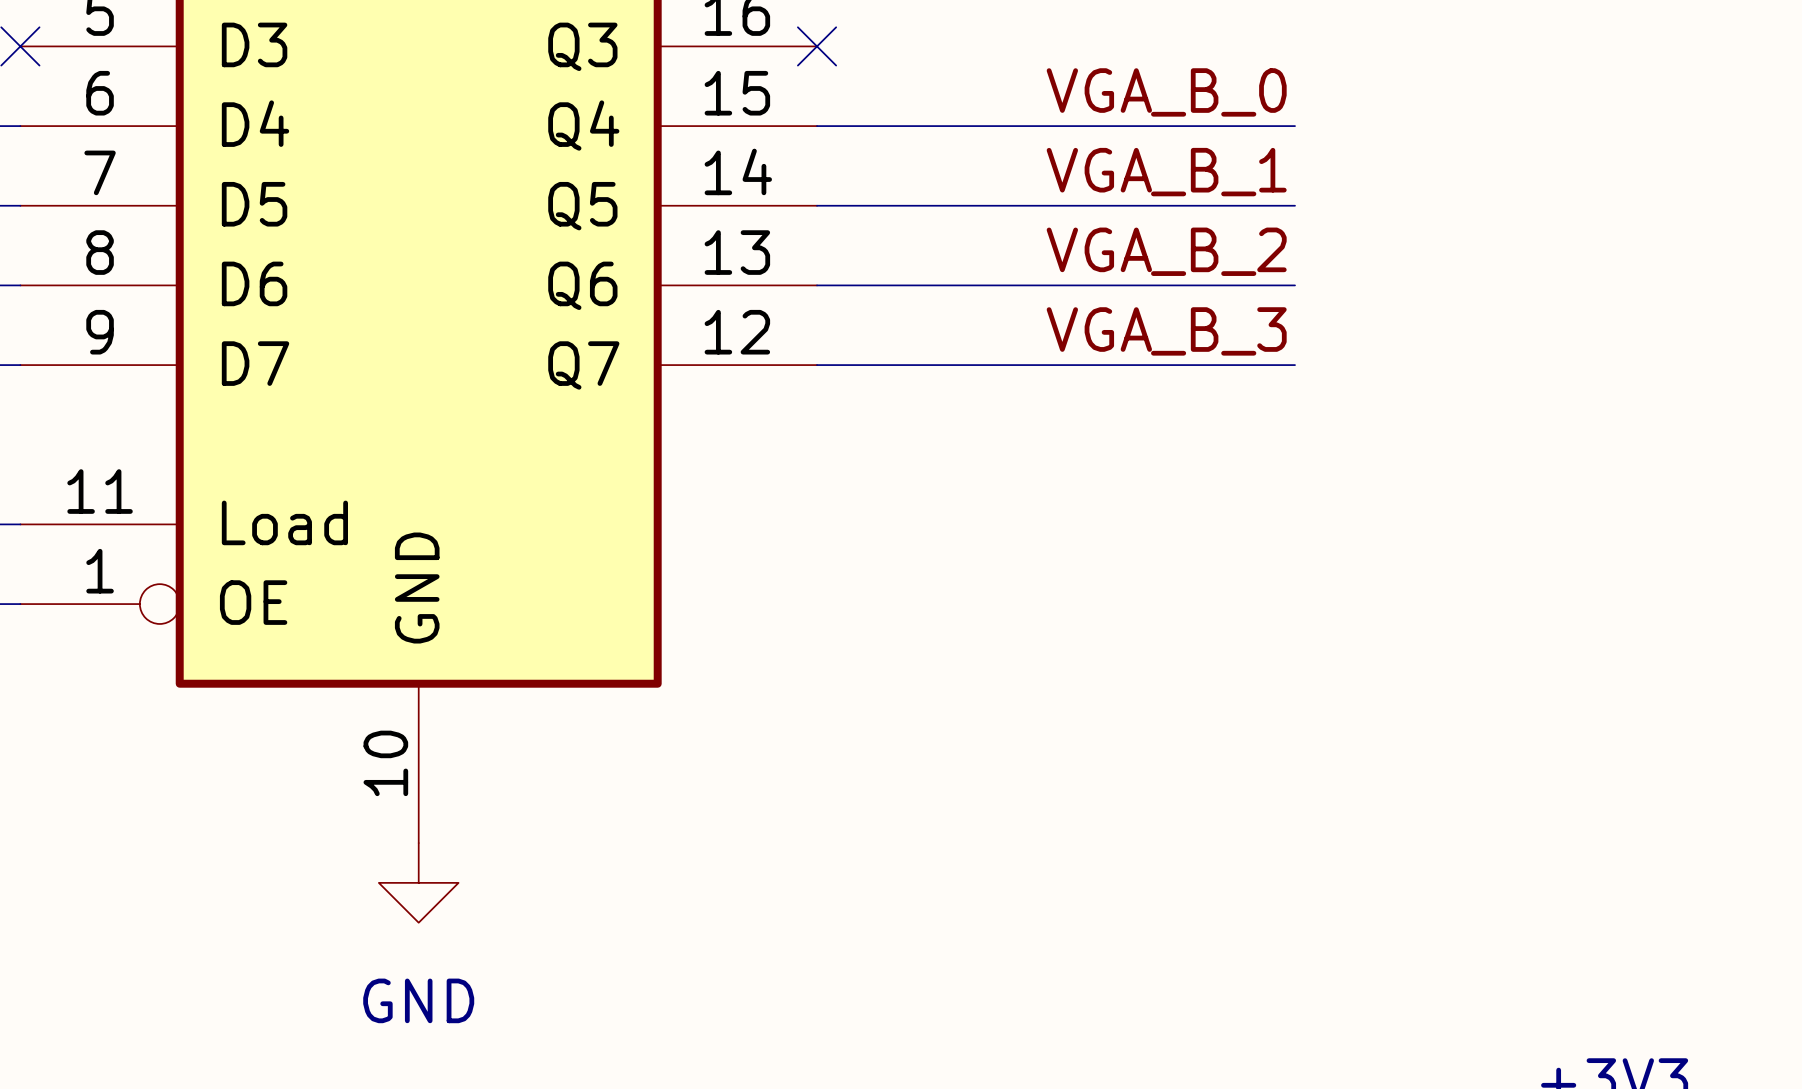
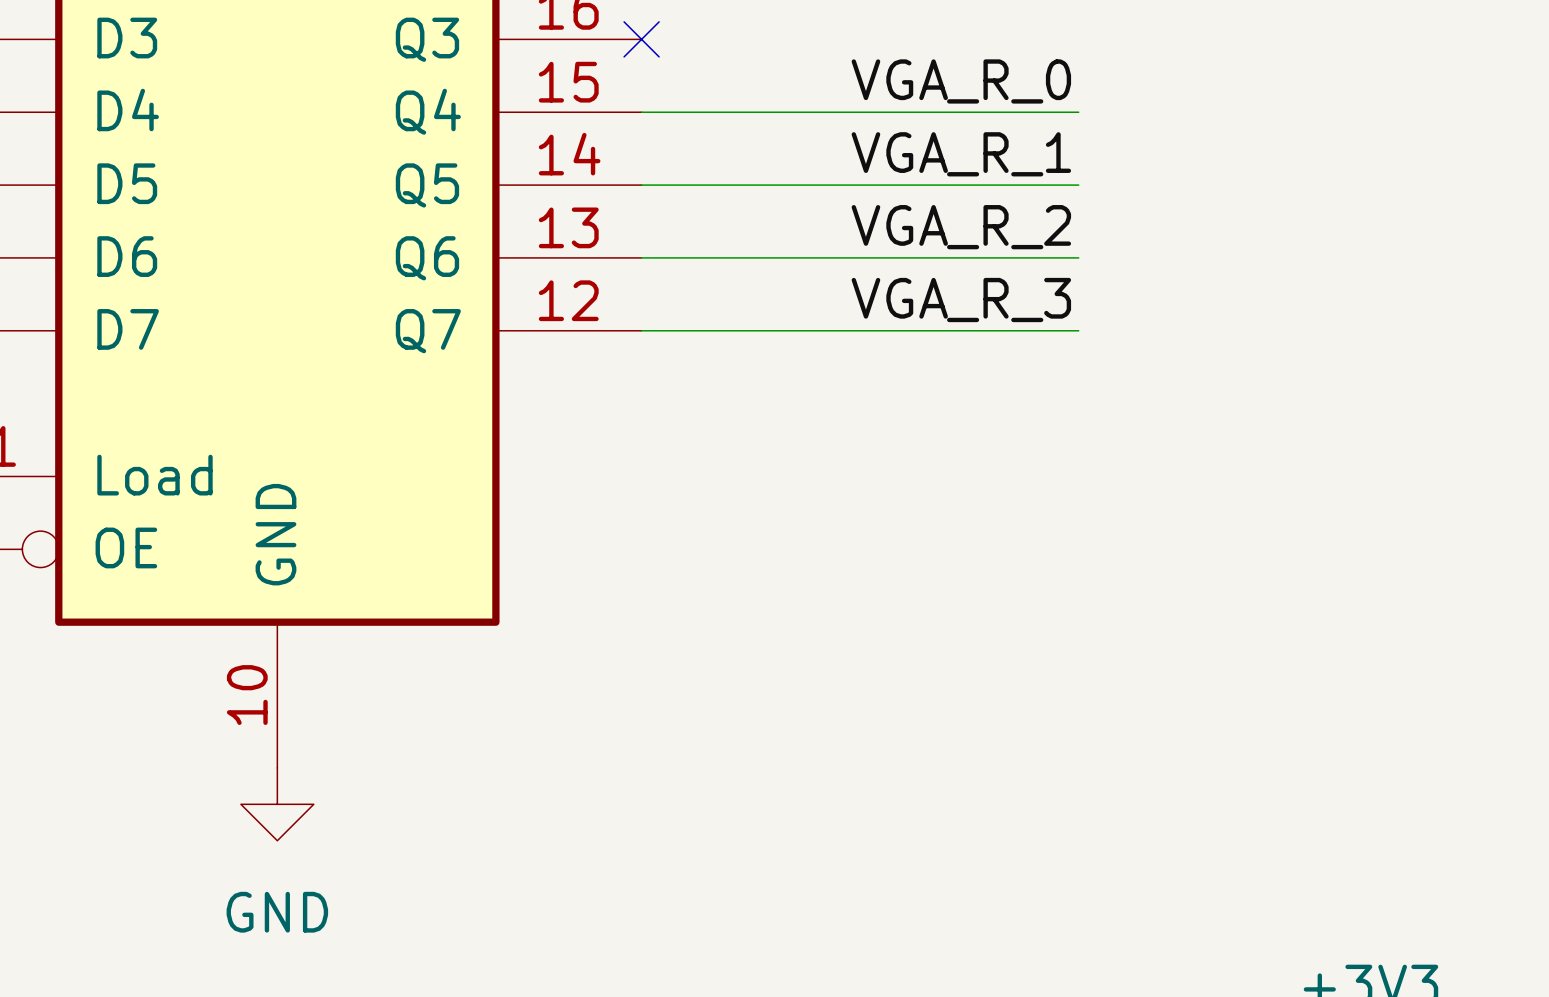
label: VGA_B_0 (1166, 92) -> VGA_R_0 (961, 81)
label: VGA_B_1 (1166, 172) -> VGA_R_1 (961, 154)
label: VGA_B_2 (1166, 251) -> VGA_R_2 (961, 227)
label: VGA_B_3 (1166, 331) -> VGA_R_3 (961, 300)

